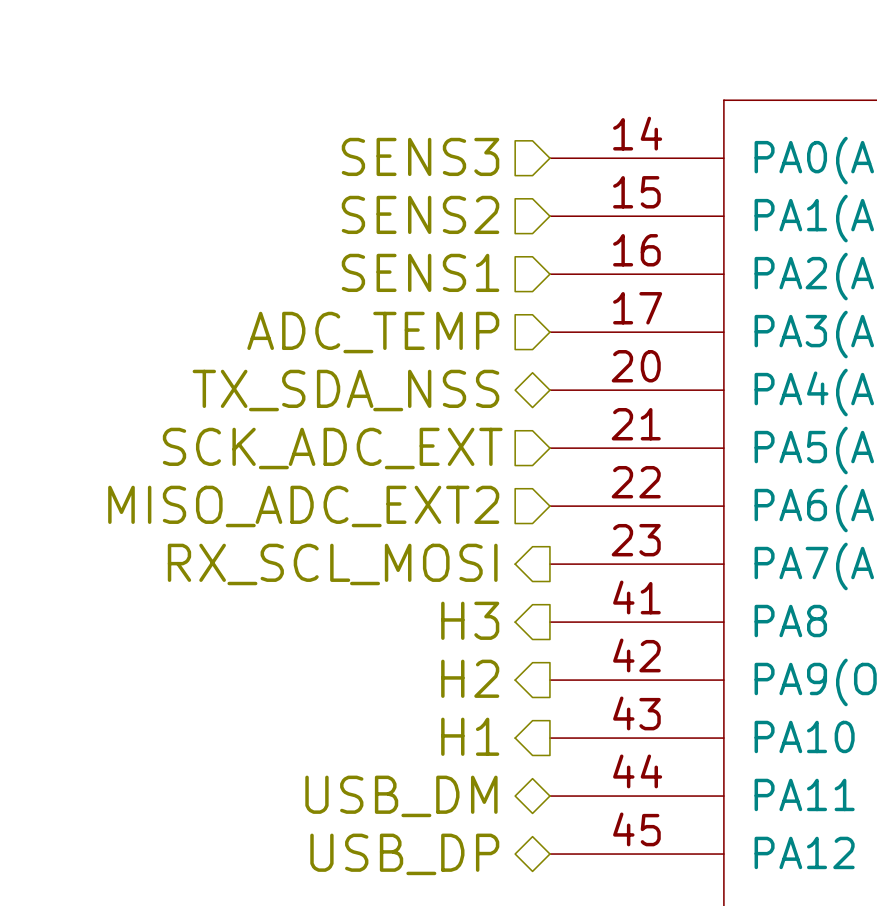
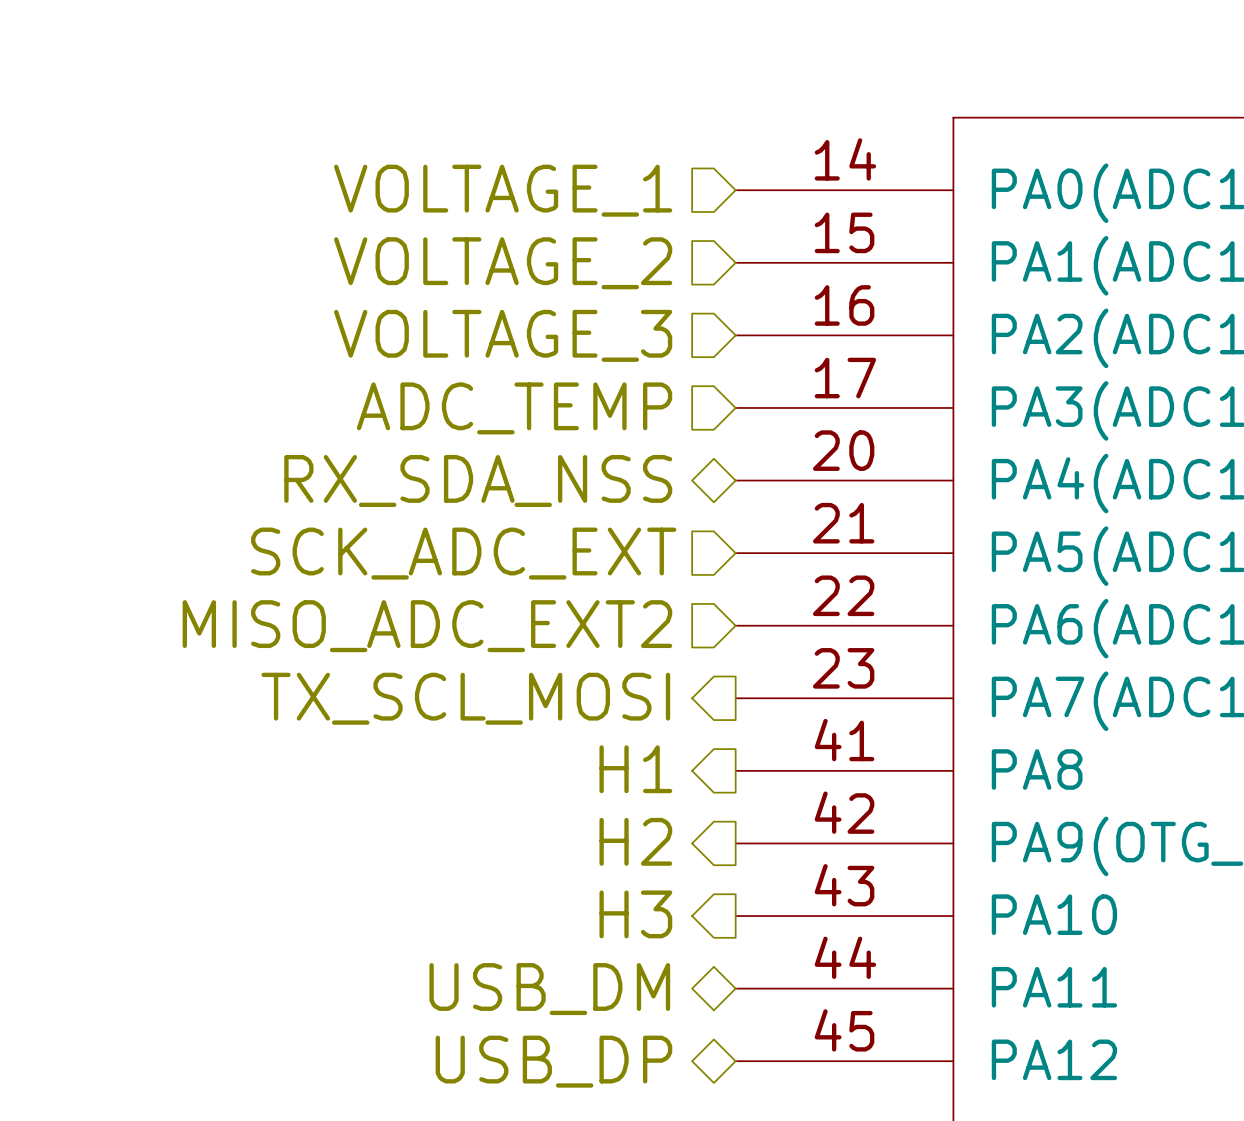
hierarchical label: SENS3 (420, 156) -> VOLTAGE_1 (503, 190)
hierarchical label: SENS2 (420, 214) -> VOLTAGE_2 (503, 263)
hierarchical label: SENS1 (420, 272) -> VOLTAGE_3 (503, 335)
hierarchical label: TX_SDA_NSS (345, 390) -> RX_SDA_NSS (478, 481)
hierarchical label: RX_SCL_MOSI (332, 564) -> TX_SCL_MOSI (465, 698)
hierarchical label: H3 (470, 620) -> H1 (635, 769)
hierarchical label: H1 (470, 736) -> H3 (635, 914)

